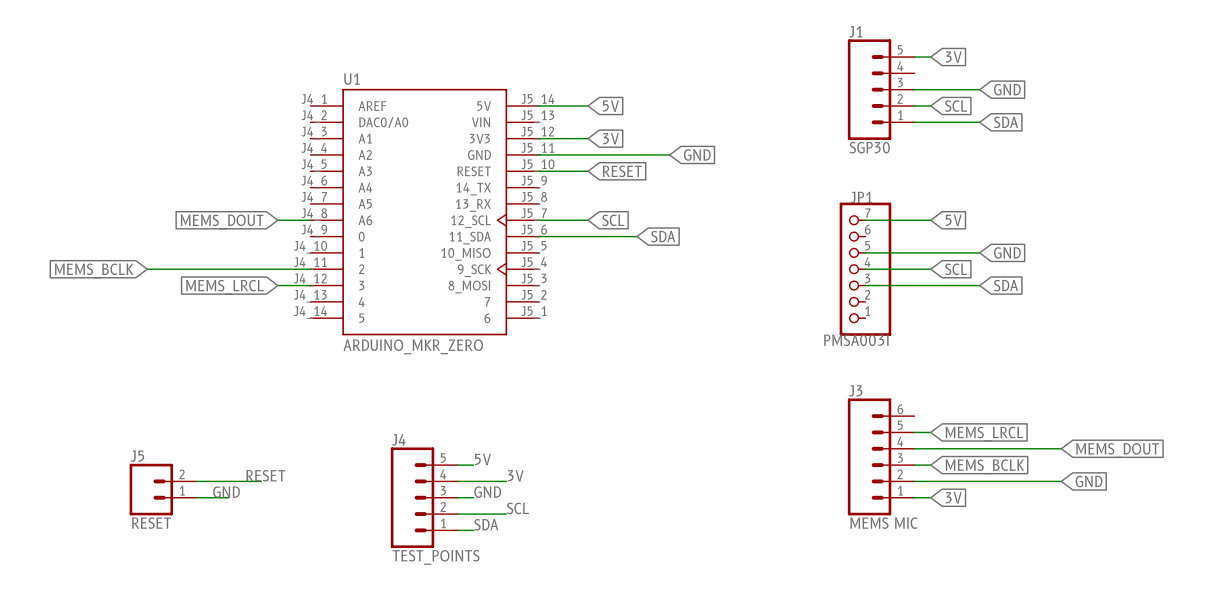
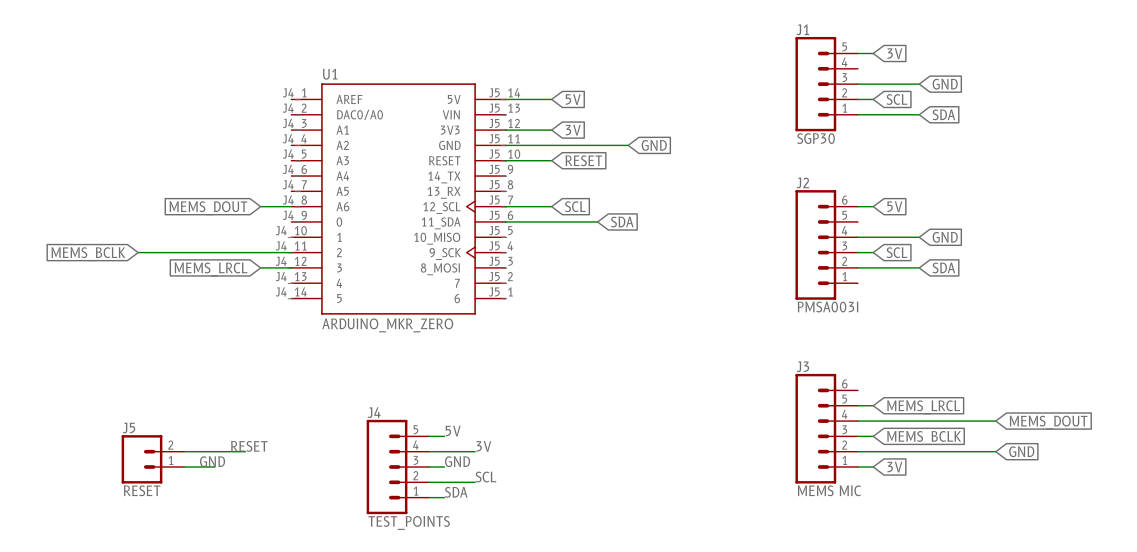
J2: none -> PMSA003I (826, 244)
JP1: PMSA003I (865, 269) -> none

